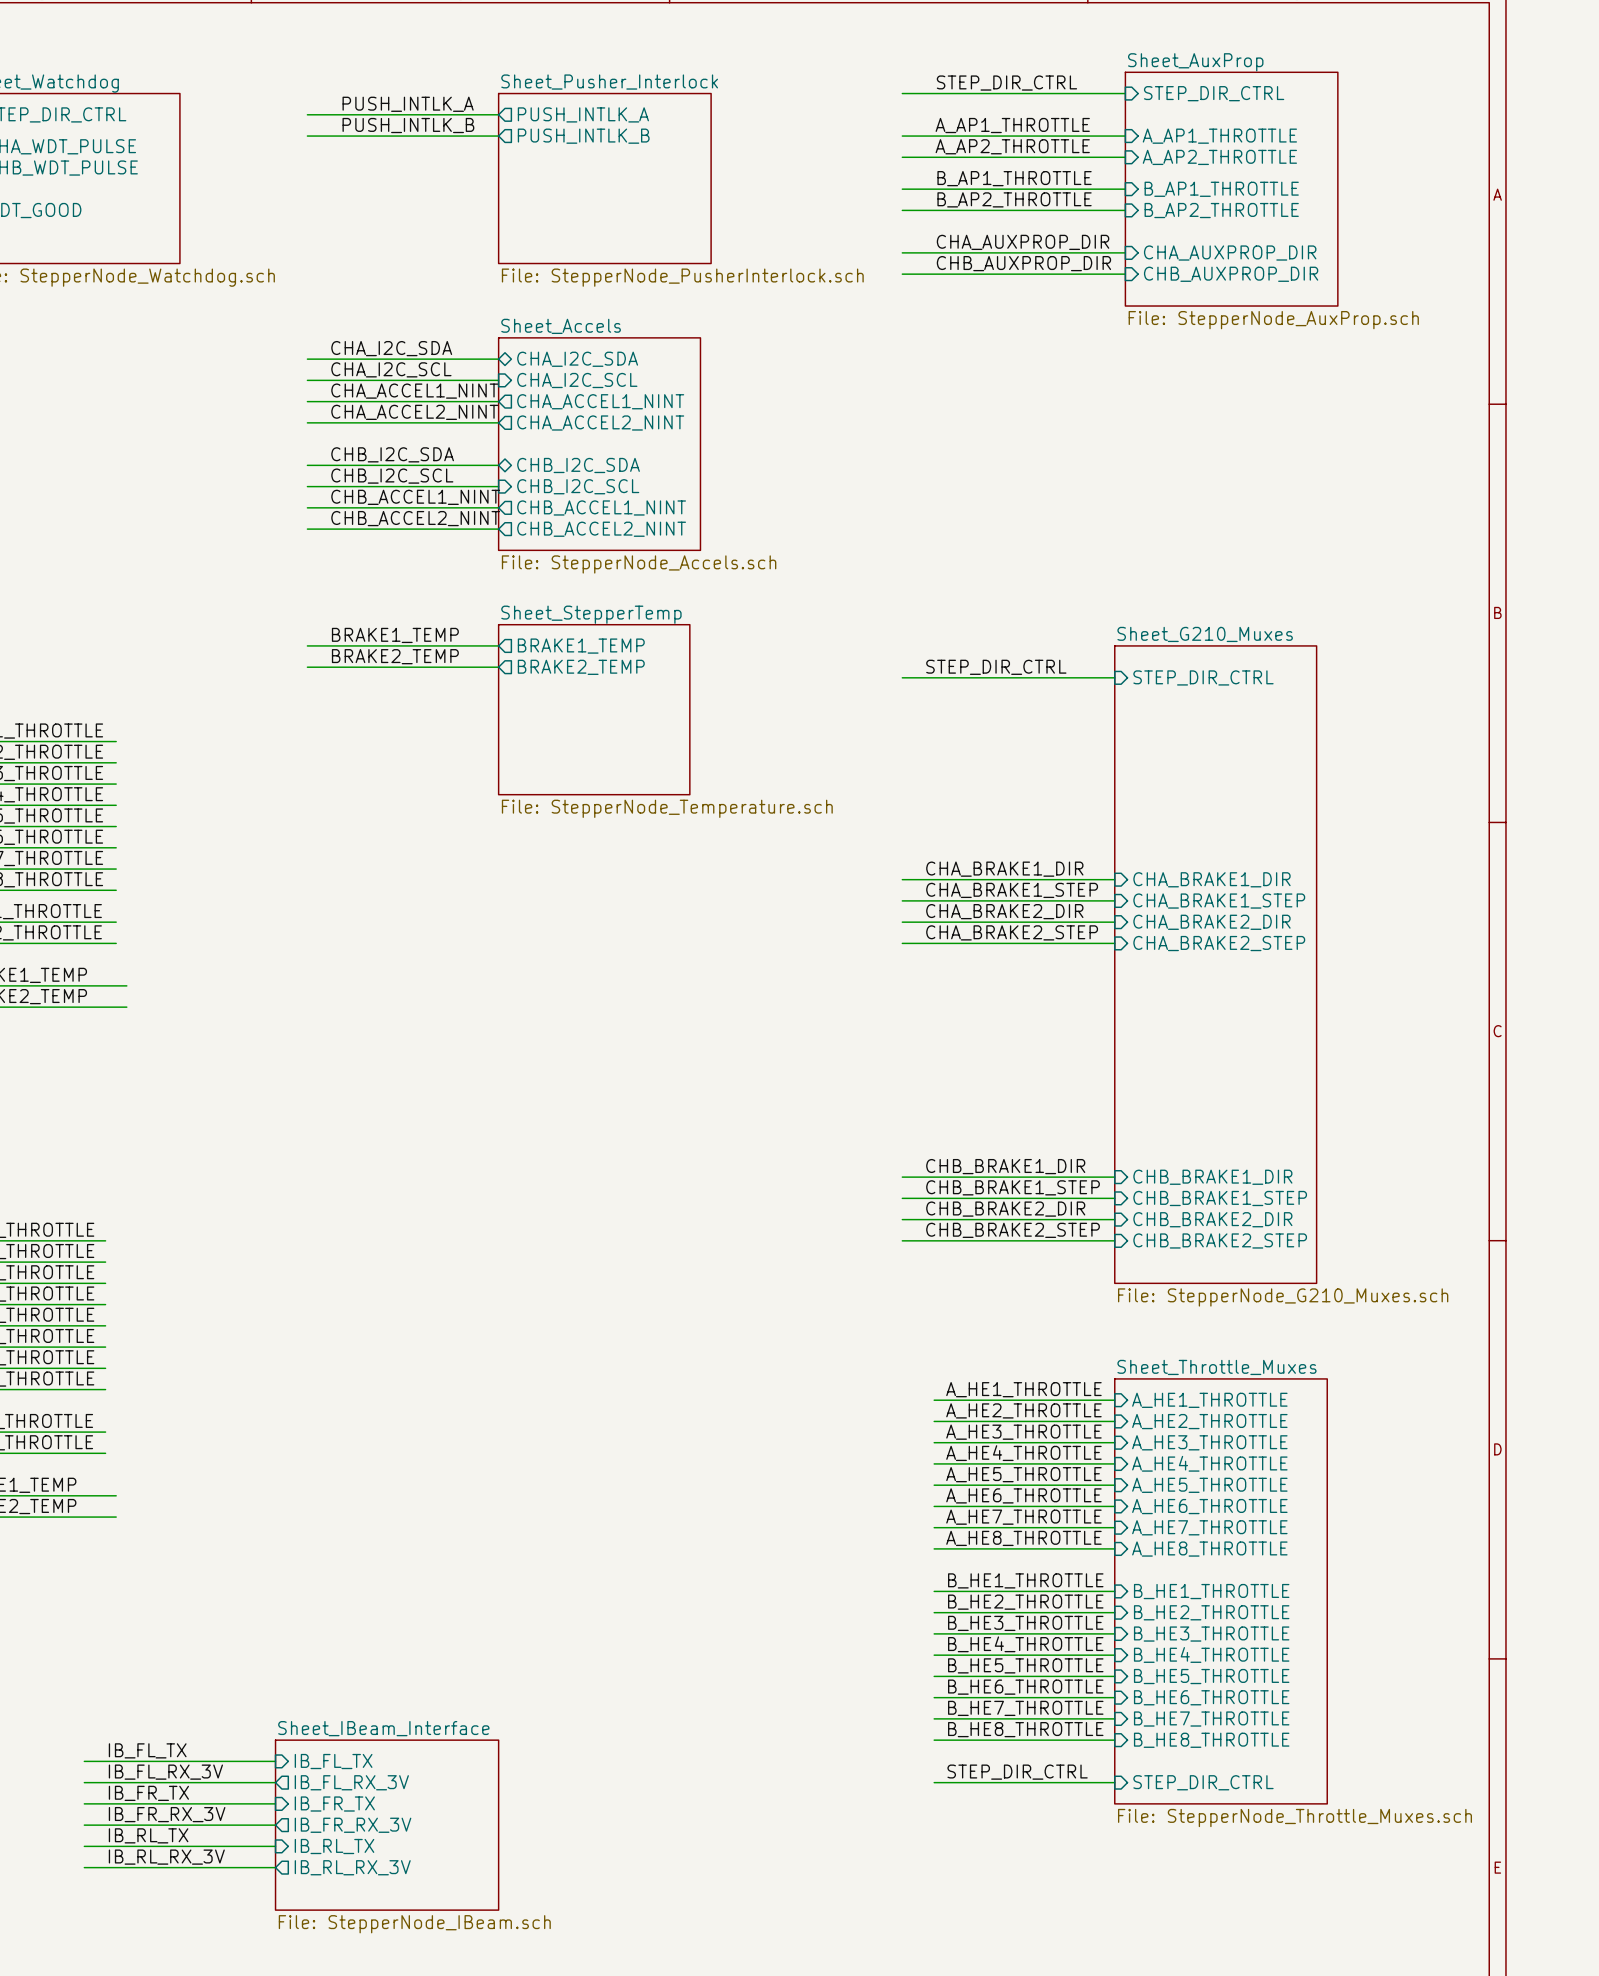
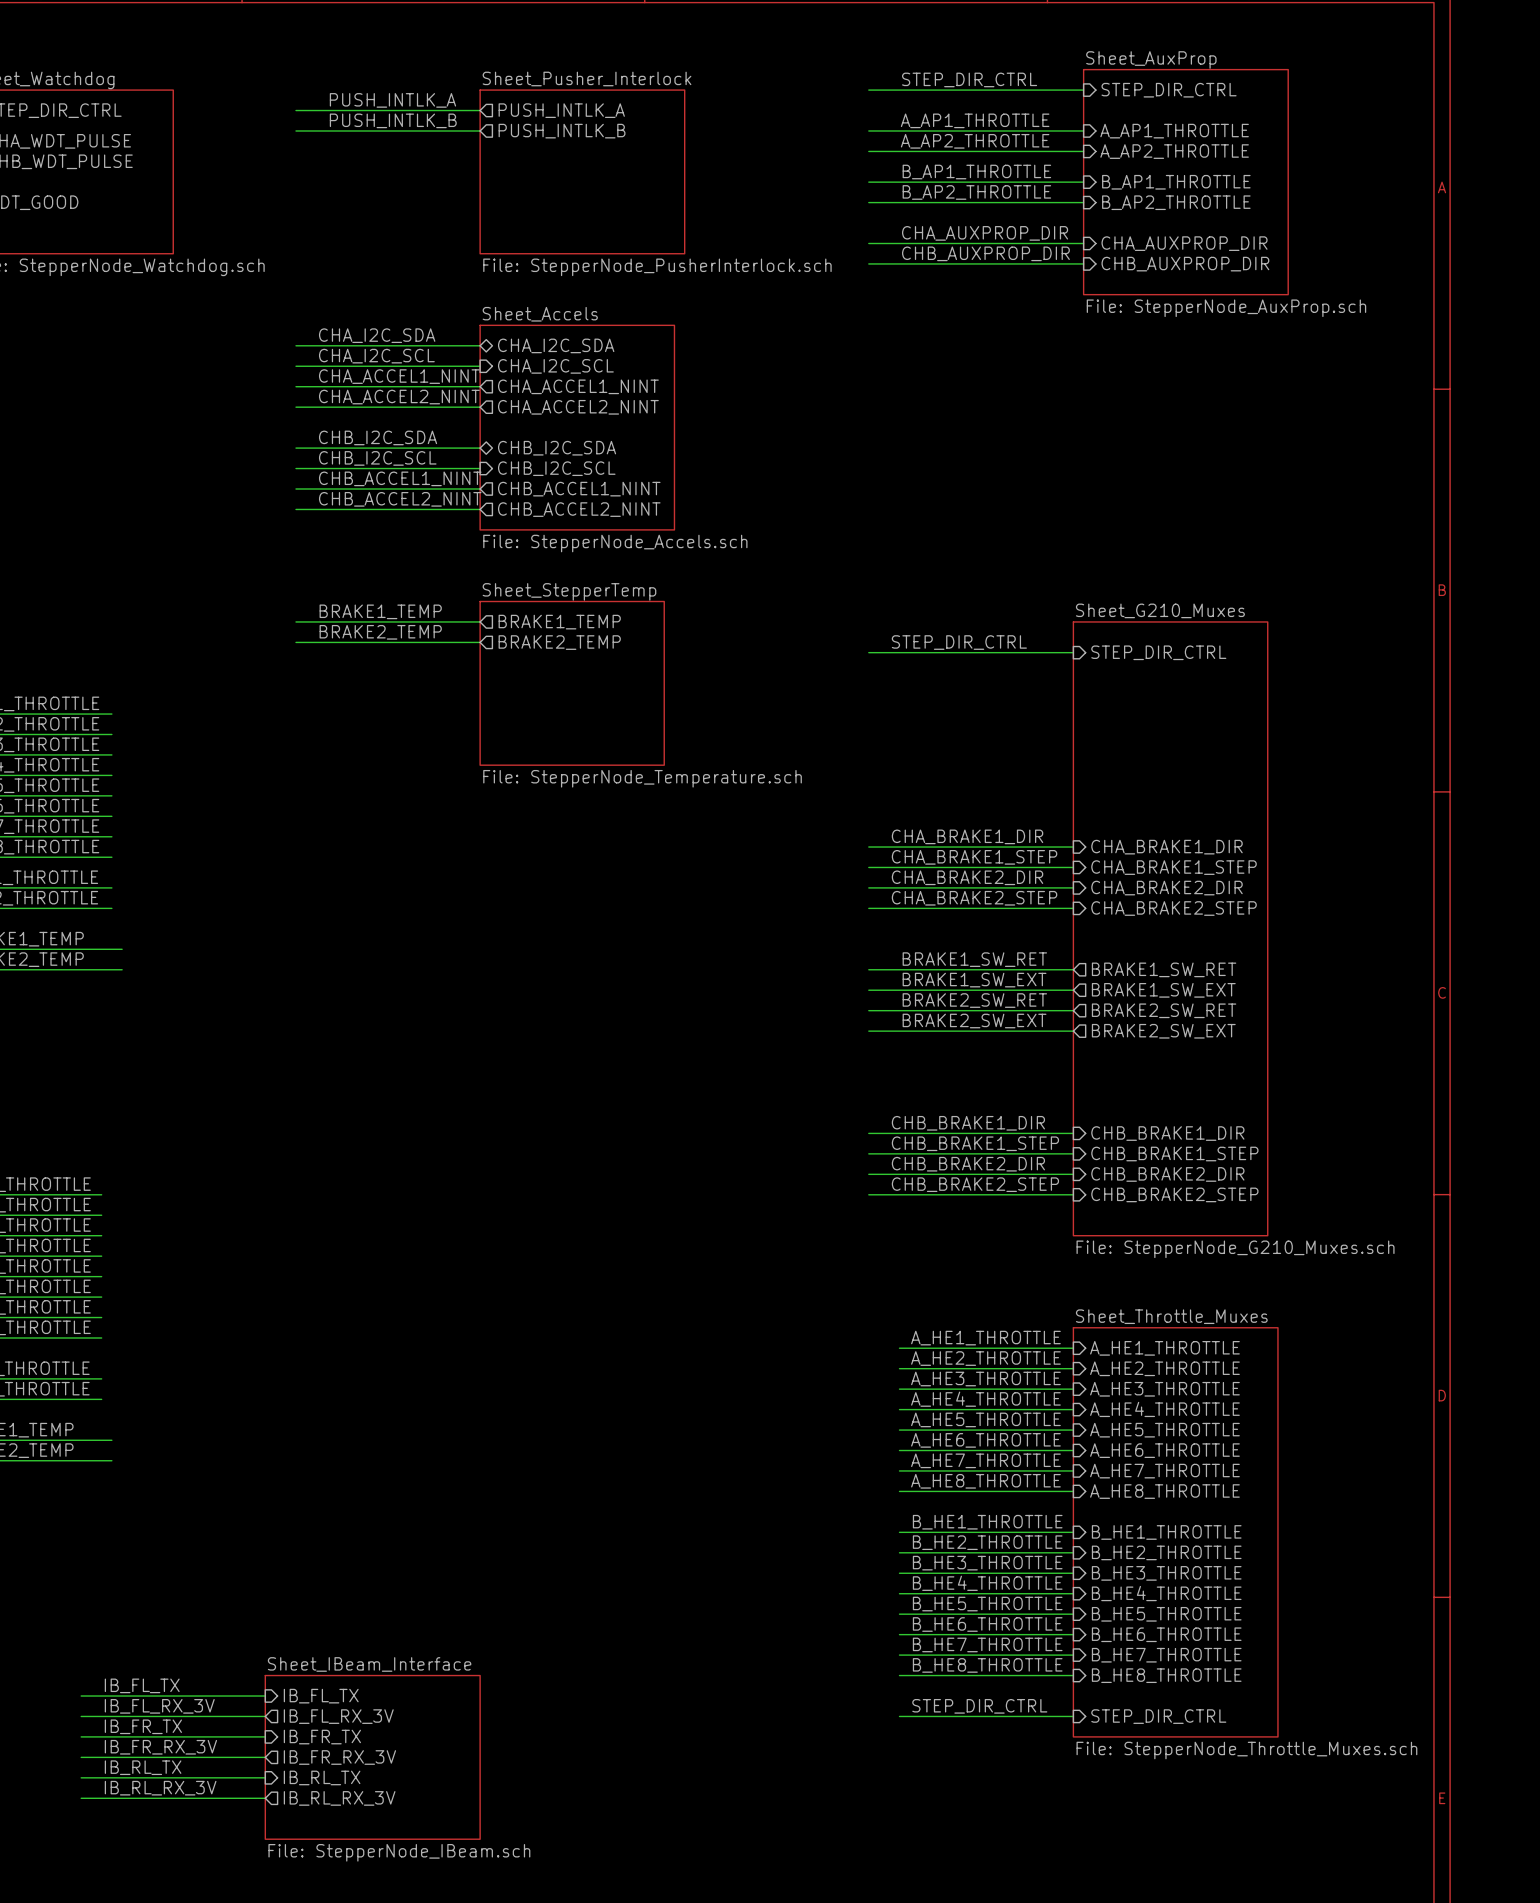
label: none -> BRAKE1_SW_RET (974, 959)
wire: none -> (868, 969) (1073, 969)
sheet pin: none -> BRAKE1_SW_RET (1164, 969)
label: none -> BRAKE1_SW_EXT (974, 980)
wire: none -> (868, 990) (1073, 990)
sheet pin: none -> BRAKE1_SW_EXT (1163, 990)
label: none -> BRAKE2_SW_RET (974, 1000)
wire: none -> (868, 1010) (1073, 1010)
sheet pin: none -> BRAKE2_SW_RET (1164, 1010)
label: none -> BRAKE2_SW_EXT (974, 1021)
wire: none -> (868, 1031) (1073, 1031)
sheet pin: none -> BRAKE2_SW_EXT (1163, 1031)

